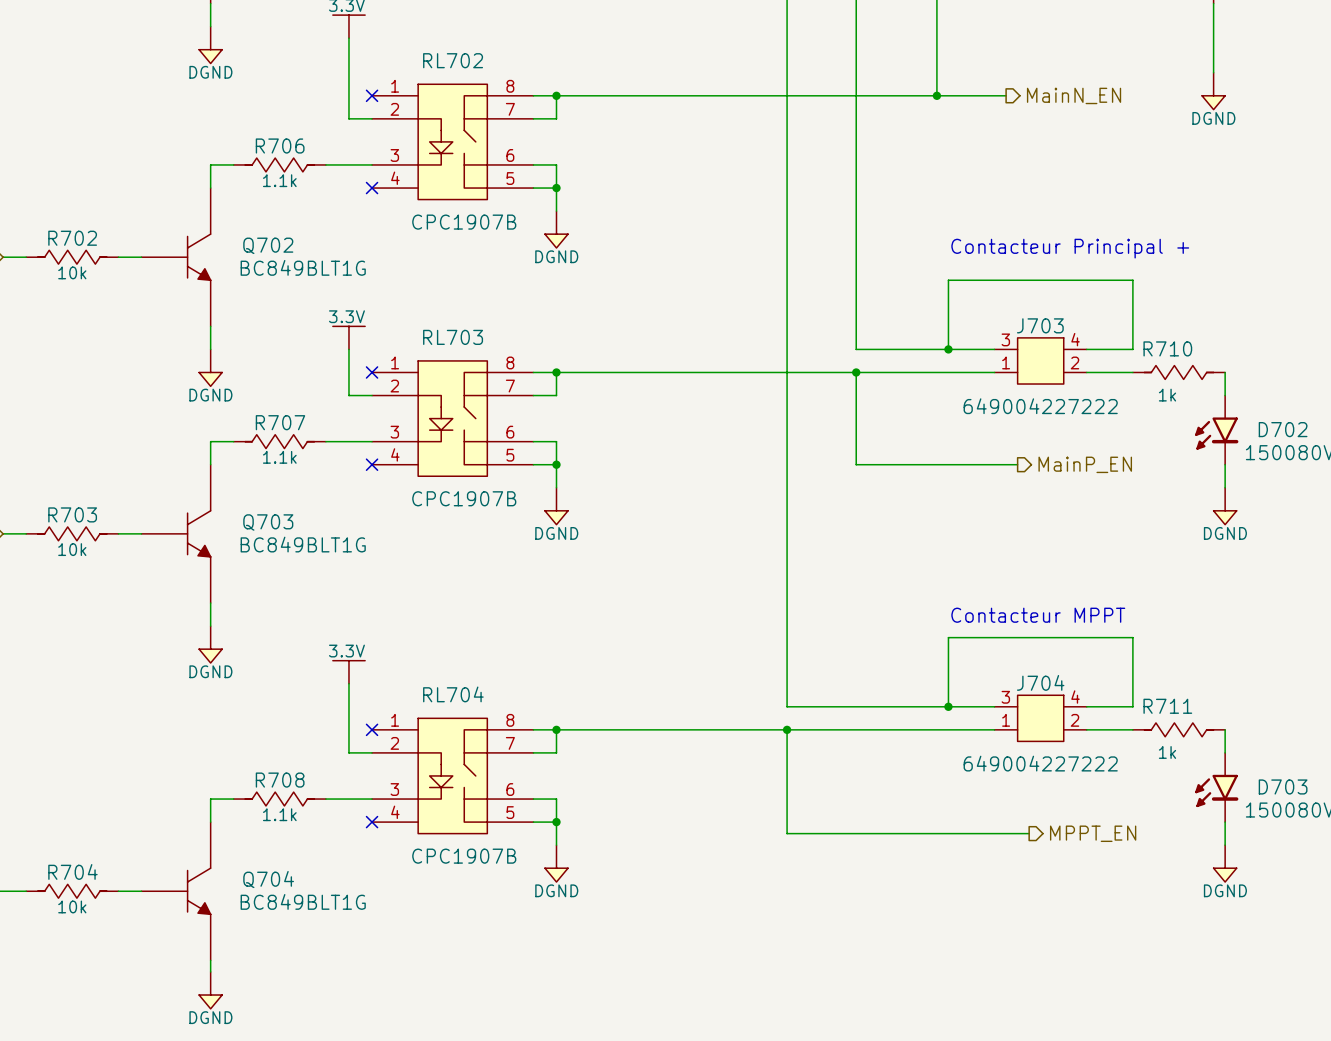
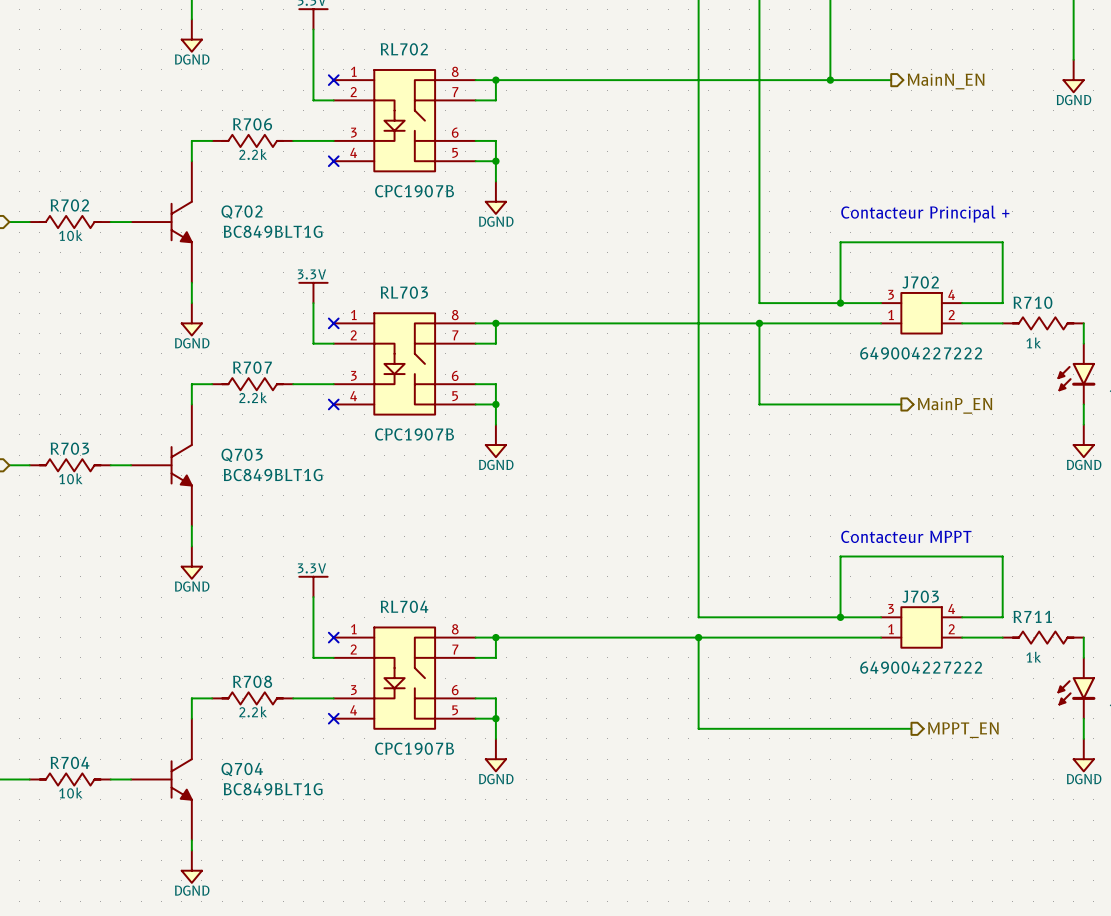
R706 text: 1.1k (279, 180) -> 2.2k (253, 154)
J703 name: J703 (1040, 325) -> J702 (920, 282)
R707 text: 1.1k (279, 457) -> 2.2k (253, 397)
J704 name: J704 (1040, 682) -> J703 (920, 596)
R708 text: 1.1k (279, 814) -> 2.2k (253, 711)

